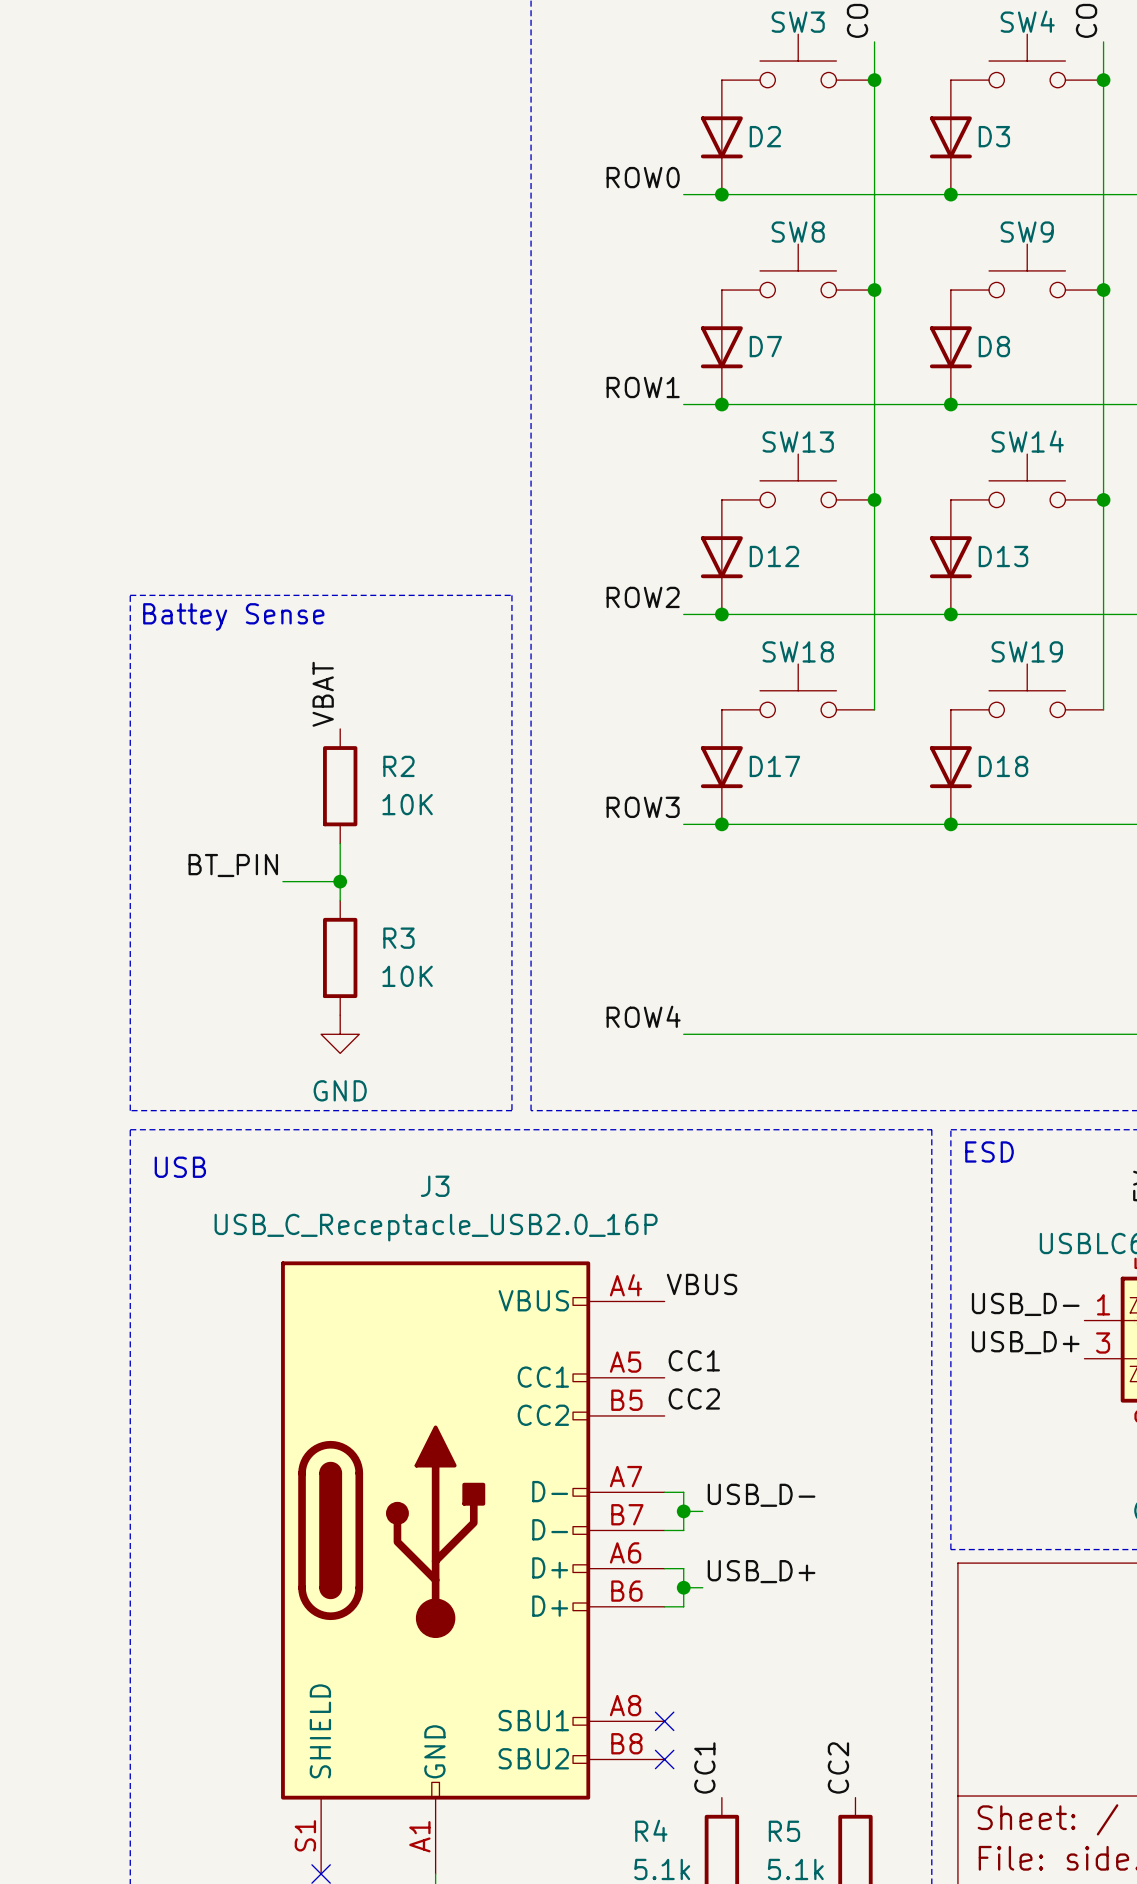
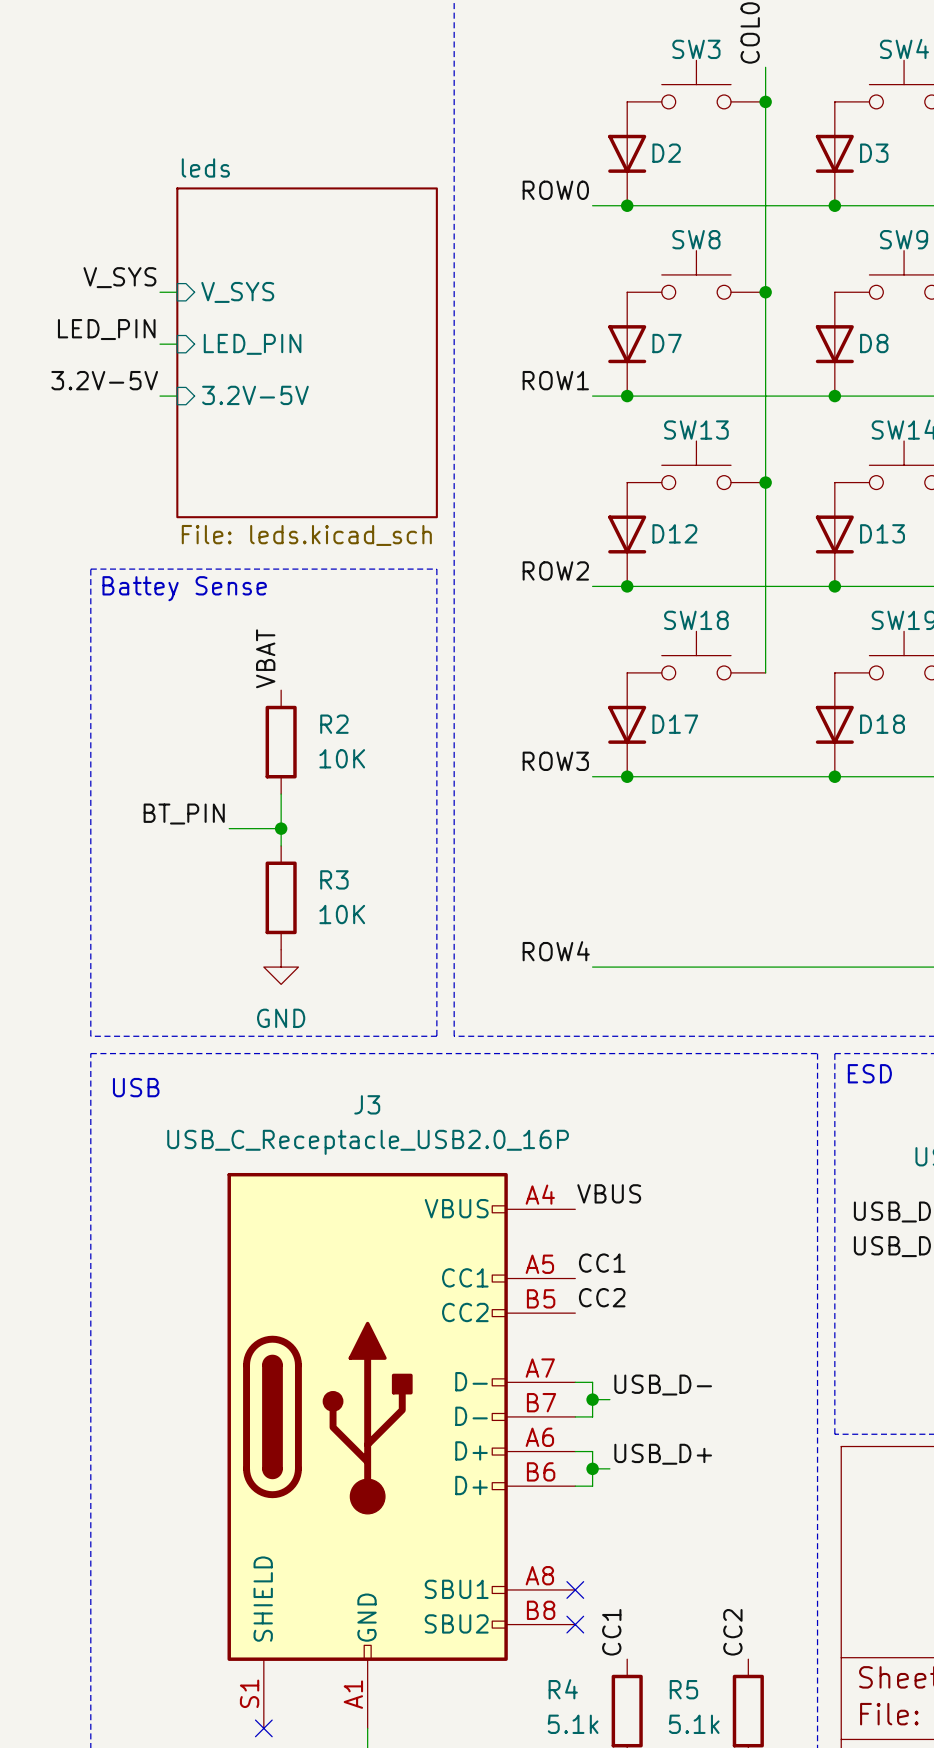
label: none -> V_SYS (119, 277)
wire: none -> (160, 292) (177, 292)
sheet pin: none -> V_SYS (237, 292)
label: none -> LED_PIN (106, 329)
wire: none -> (160, 344) (177, 344)
sheet pin: none -> LED_PIN (252, 344)
sheet leds: none -> File: leds.kicad_sch (307, 352)
label: none -> 3.2V-5V (104, 380)
sheet pin: none -> 3.2V-5V (255, 395)
wire: none -> (160, 396) (177, 396)

